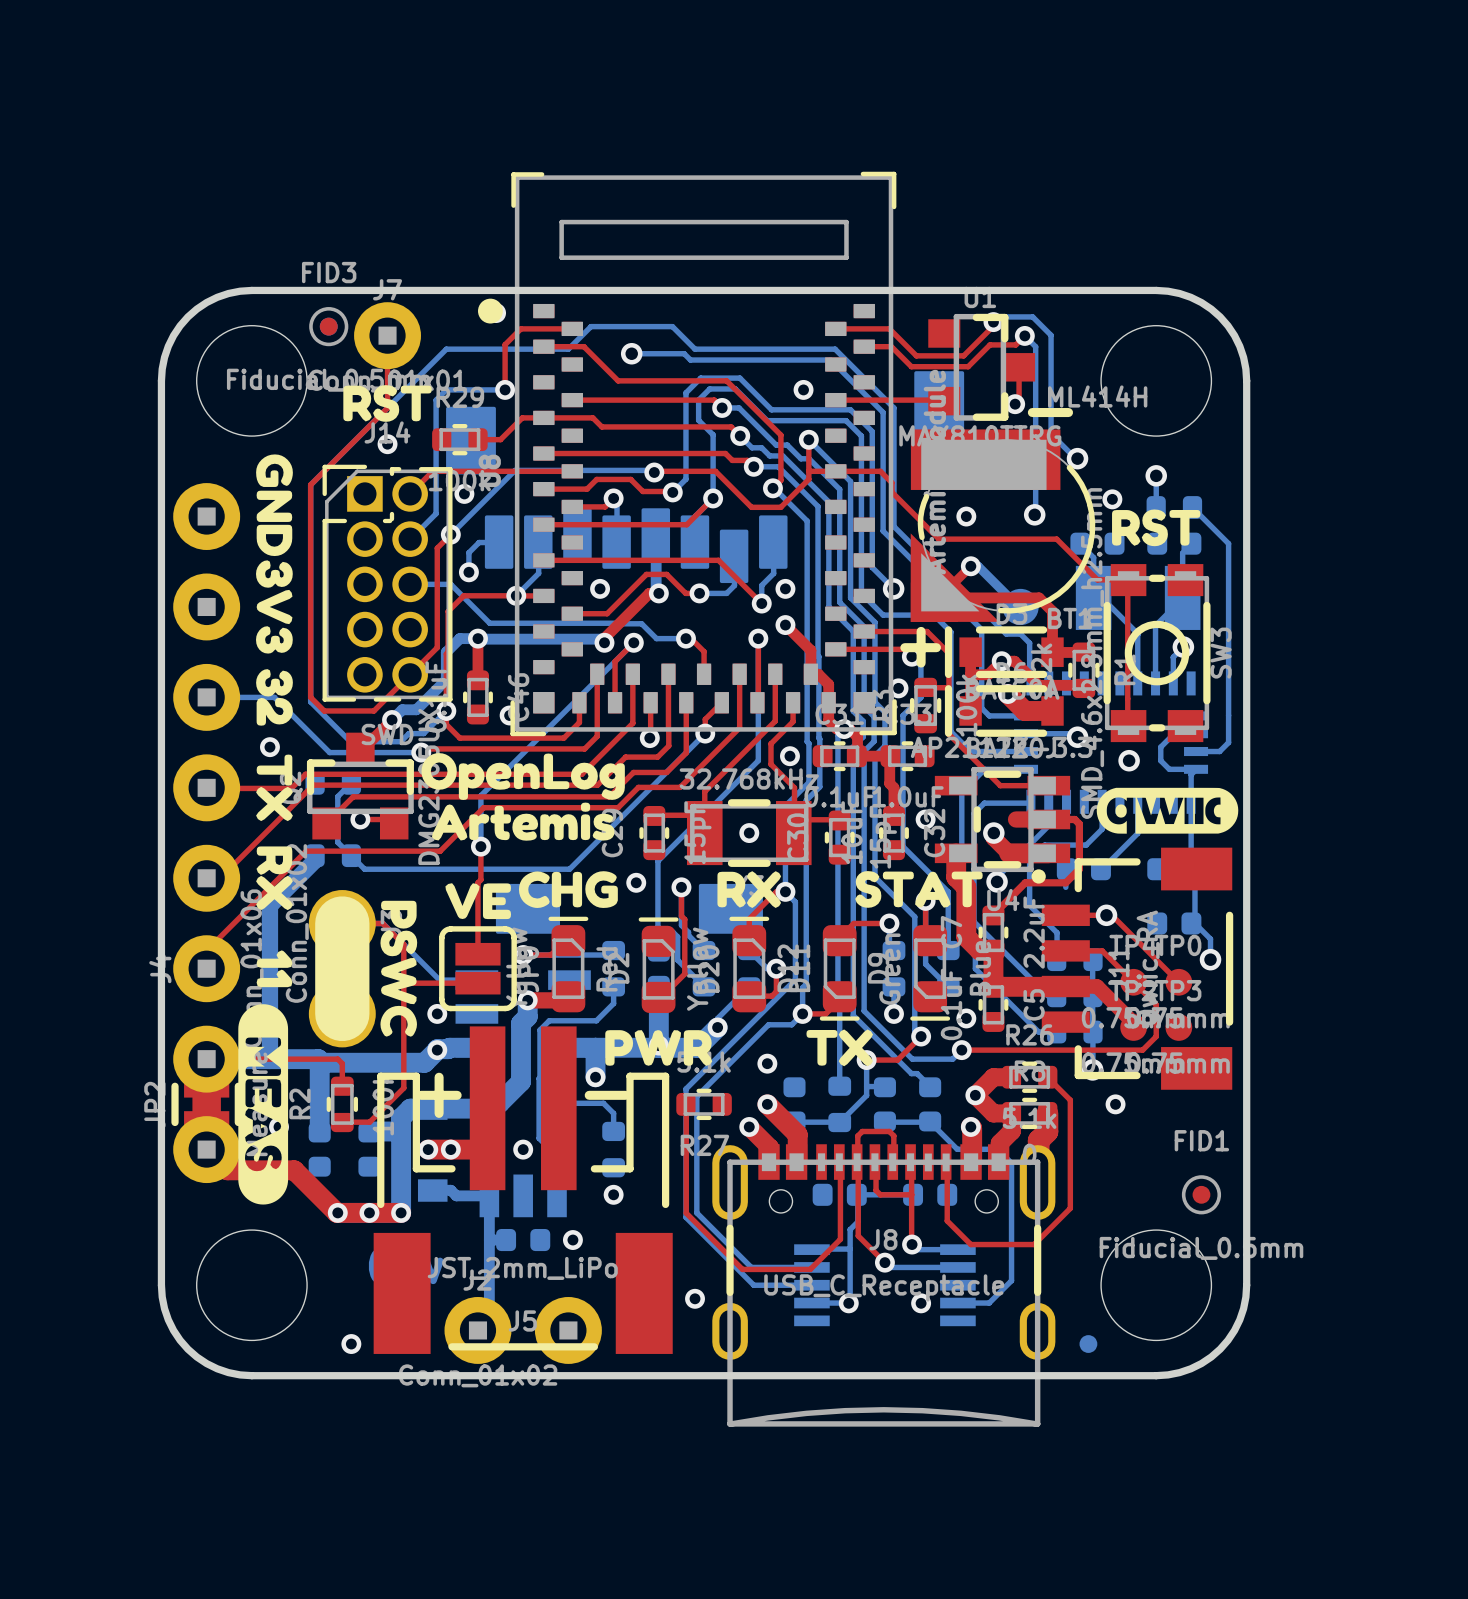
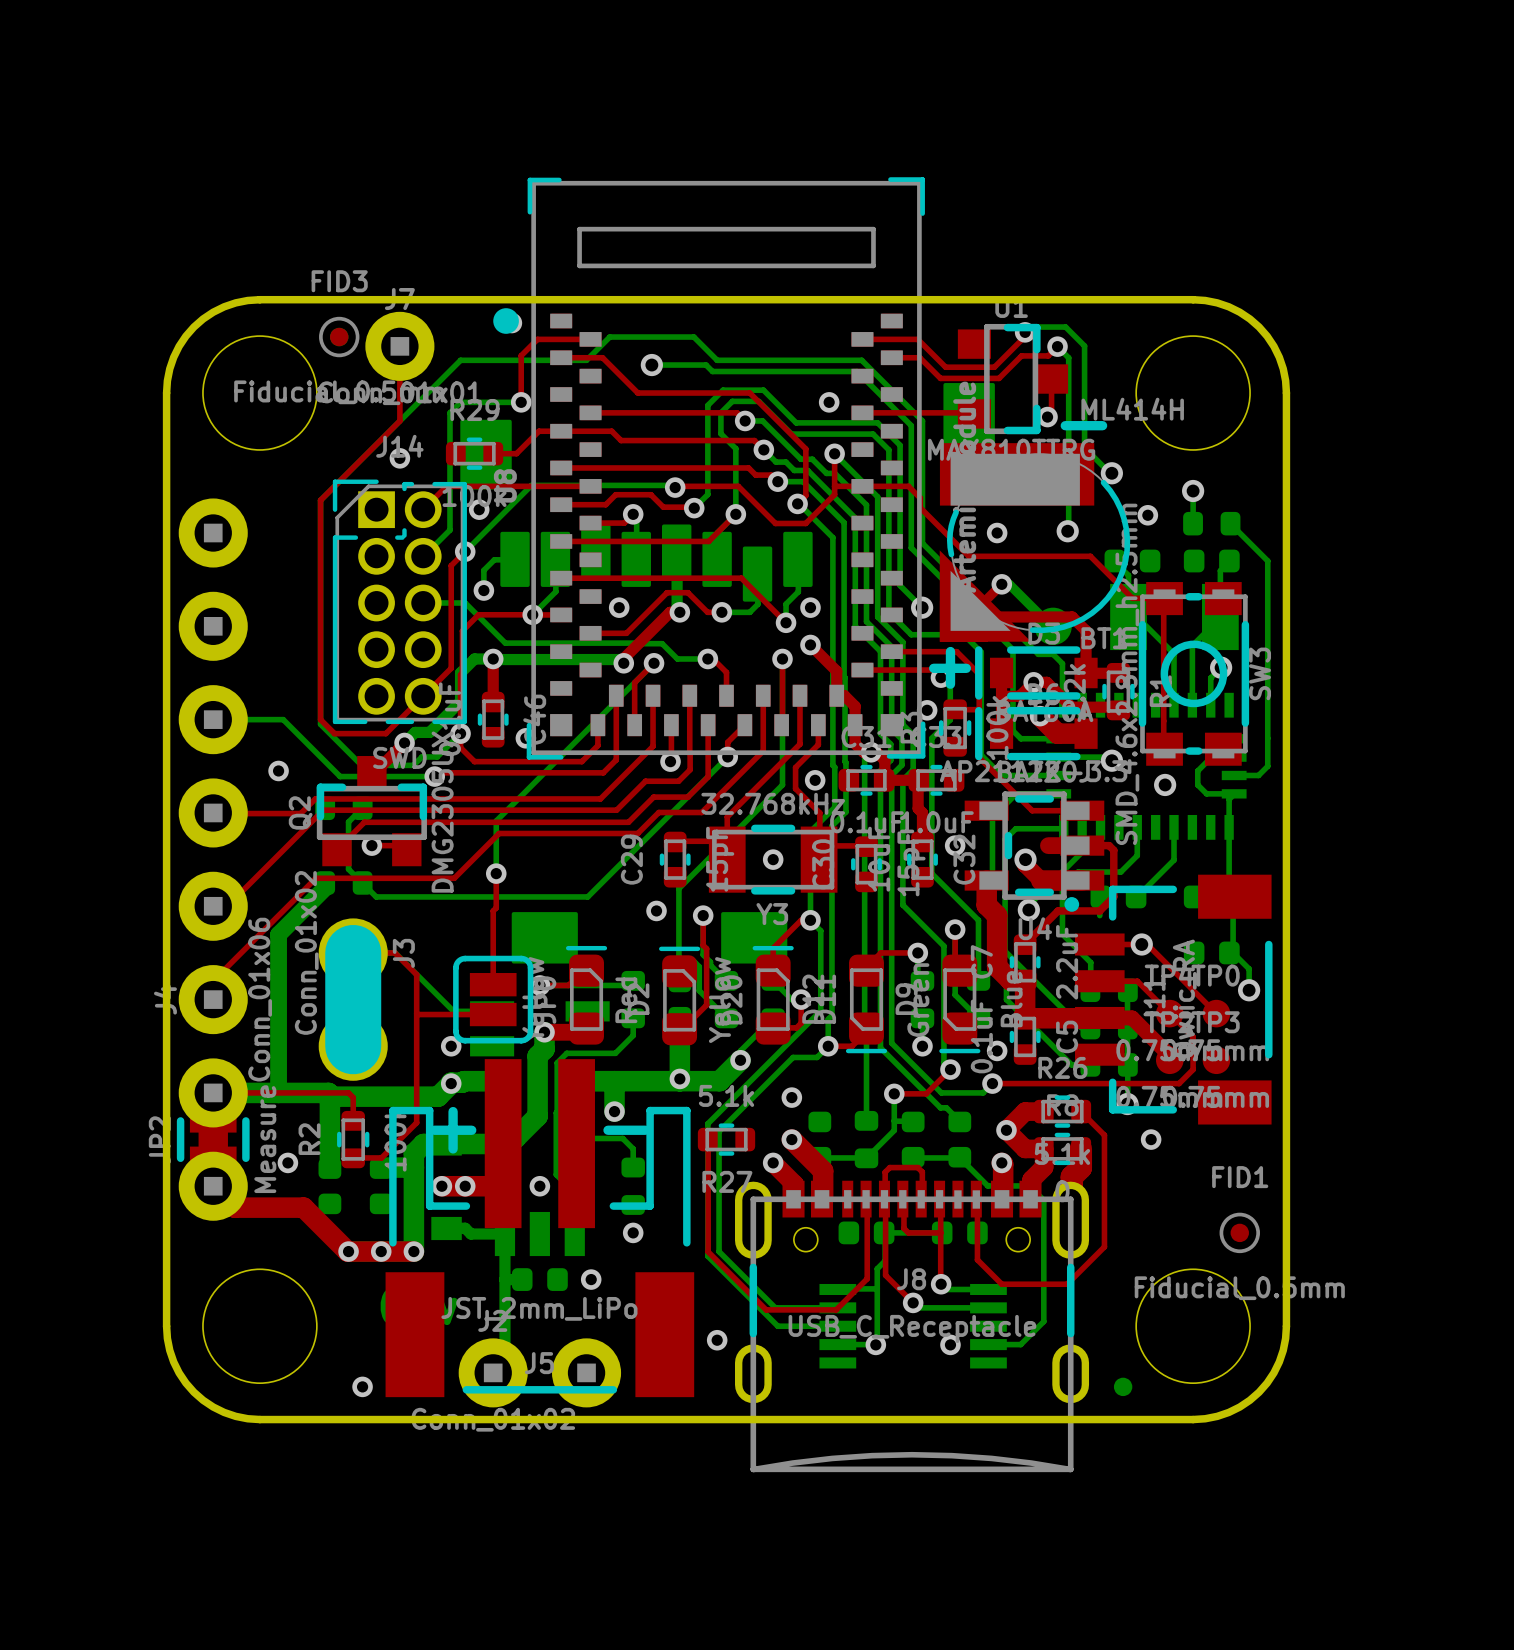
drawing: [343, 385, 432, 422] -> none
drawing: [238, 454, 293, 1205] -> none
drawing: [1112, 509, 1201, 547] -> none
drawing: [380, 753, 625, 1037] -> none
drawing: [1096, 787, 1239, 834] -> none
drawing: [717, 871, 782, 908] -> none
drawing: [855, 871, 983, 908] -> none
drawing: [806, 1029, 873, 1067] -> none
drawing: [605, 1030, 713, 1066] -> none

